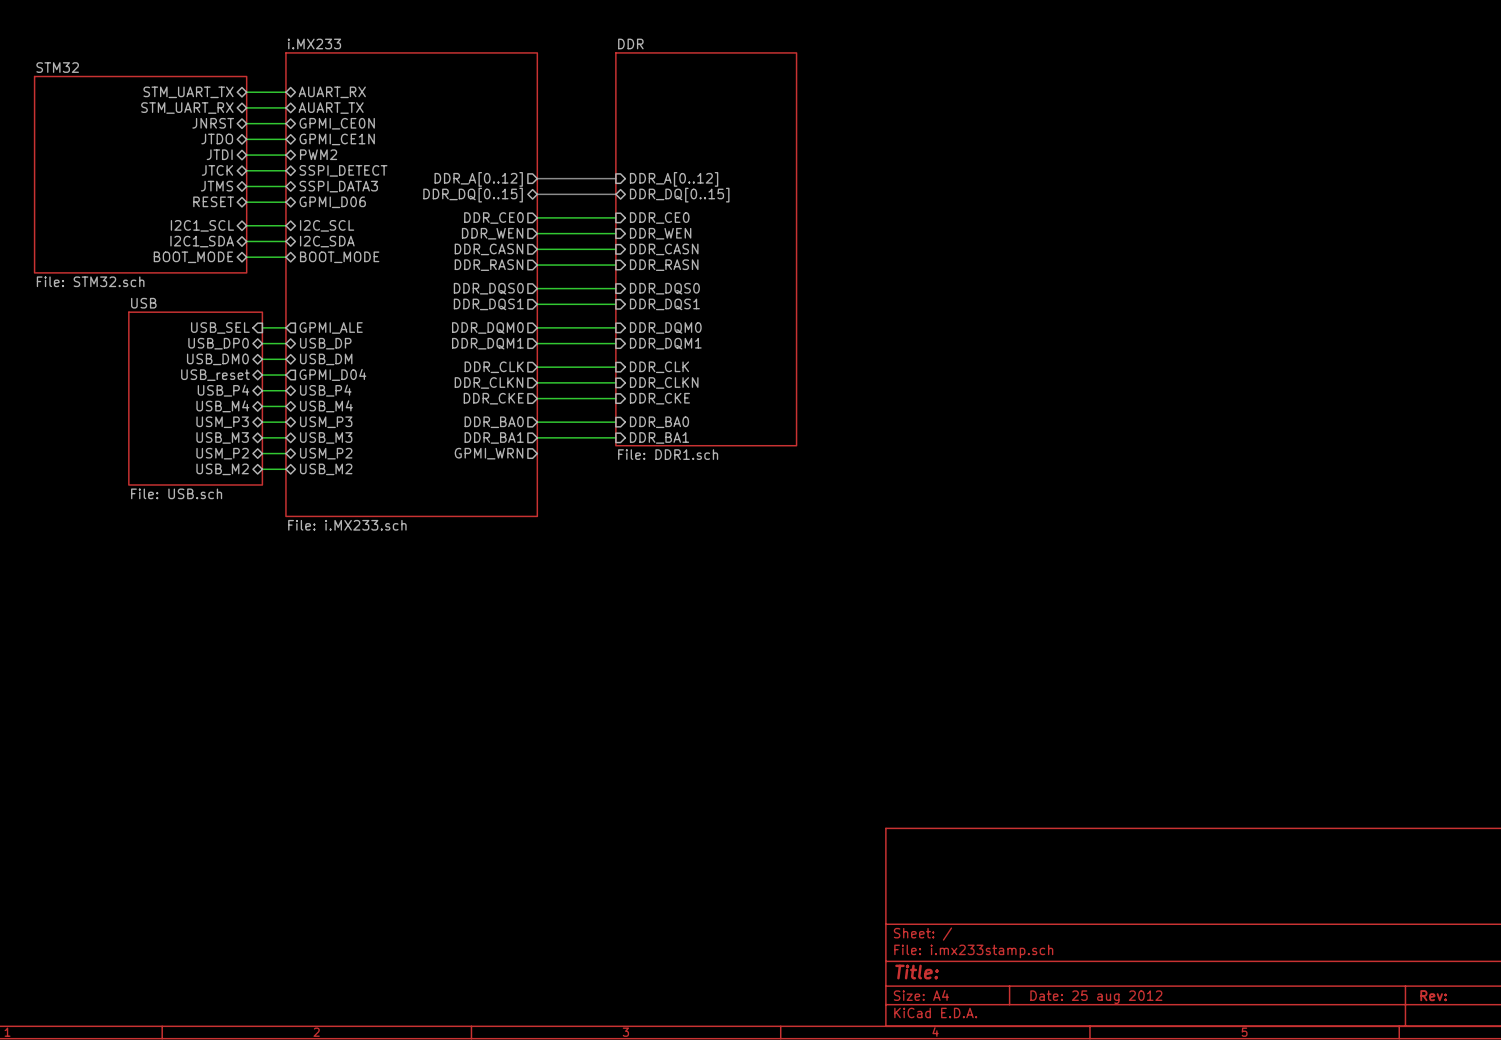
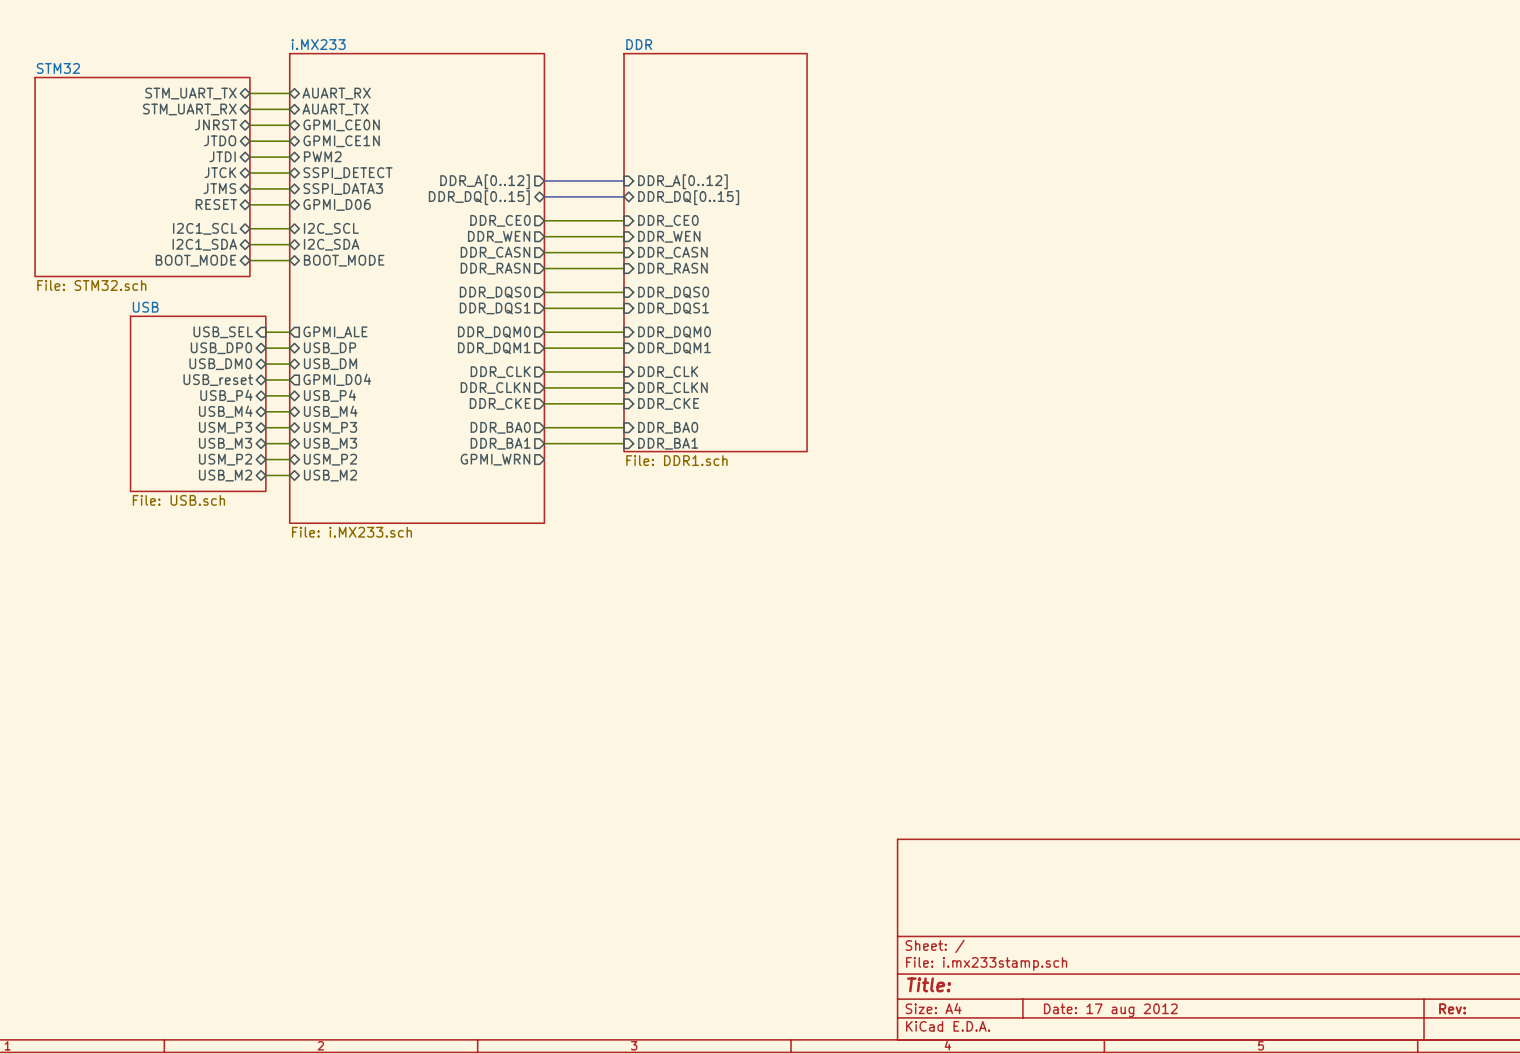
title block: Date: 25 aug 2012 (1096, 997) -> Date: 17 aug 2012 (1110, 1010)

